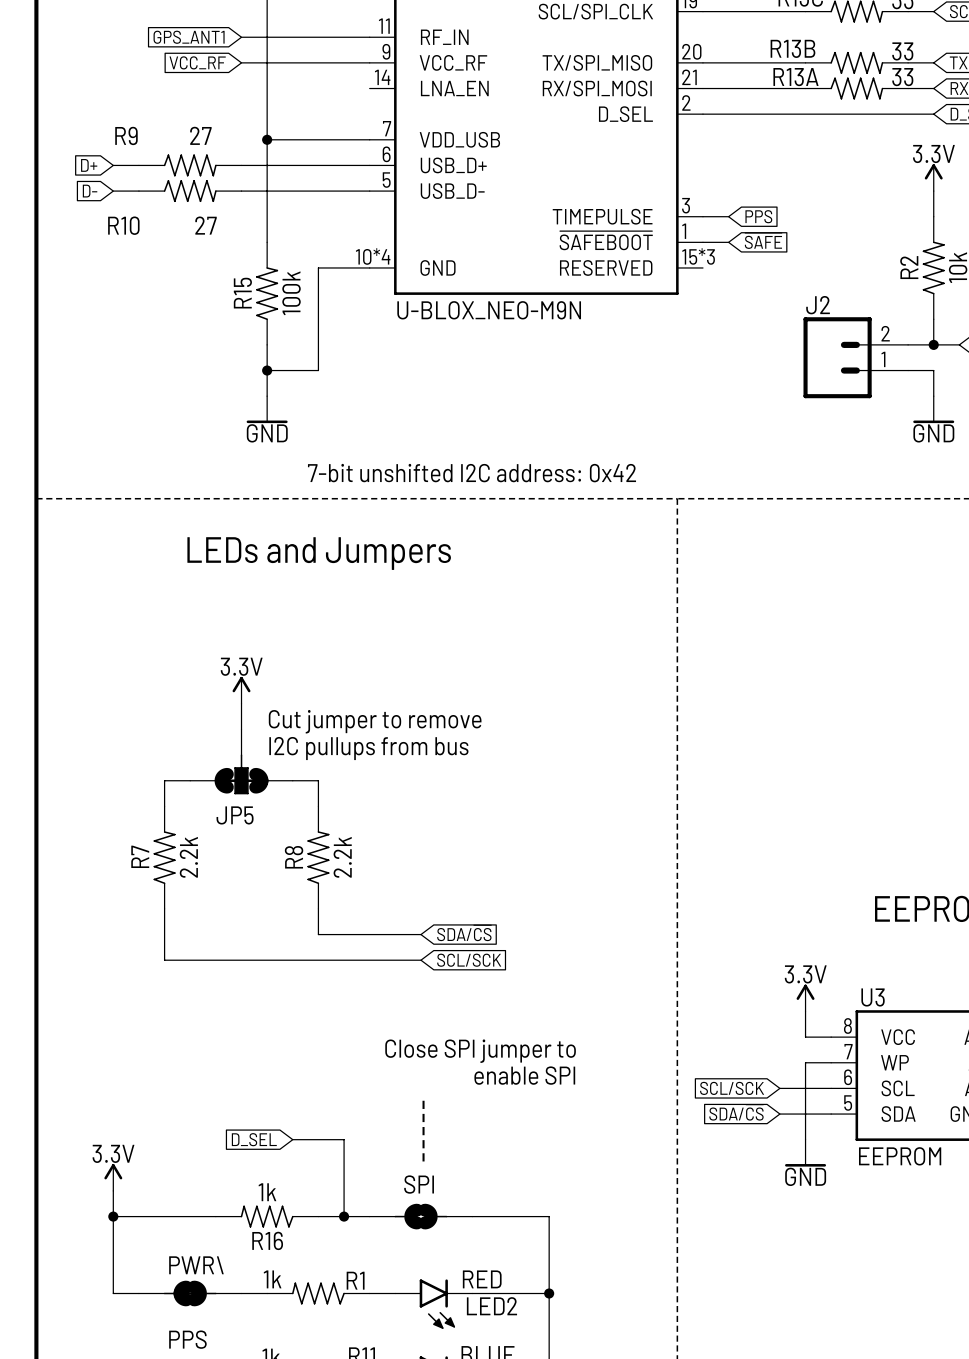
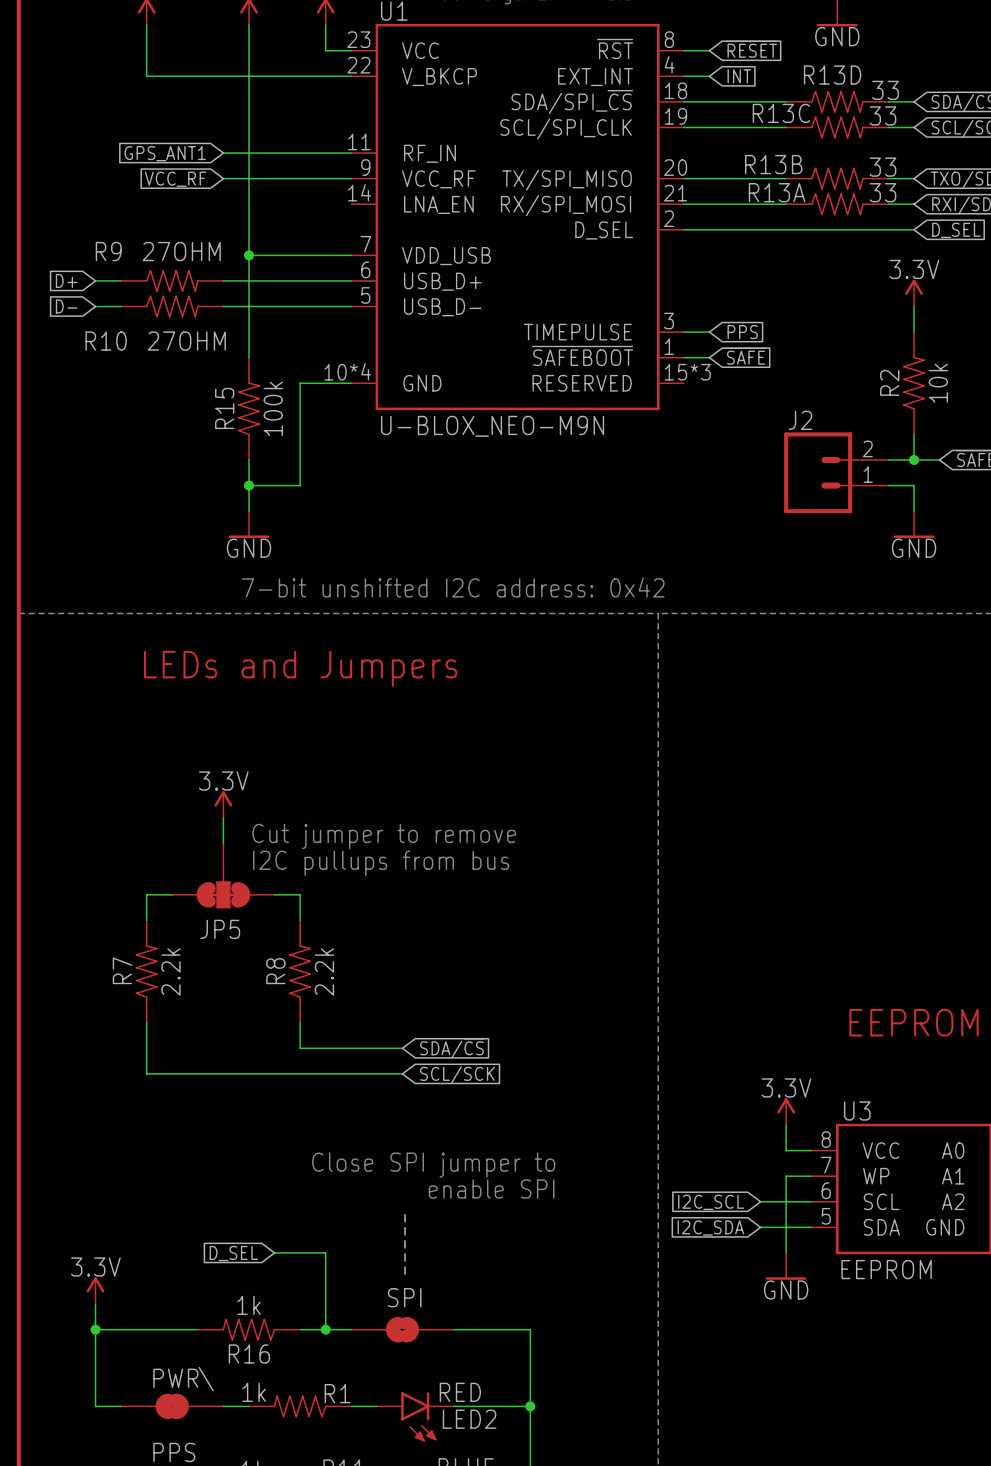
R9 value: 27 (200, 135) -> 27OHM (181, 251)
R10 value: 27 (206, 225) -> 27OHM (186, 341)
global label: SCL/SCK (732, 1088) -> I2C_SCL (711, 1202)
global label: SDA/~{CS} (736, 1112) -> I2C_SDA (710, 1227)

